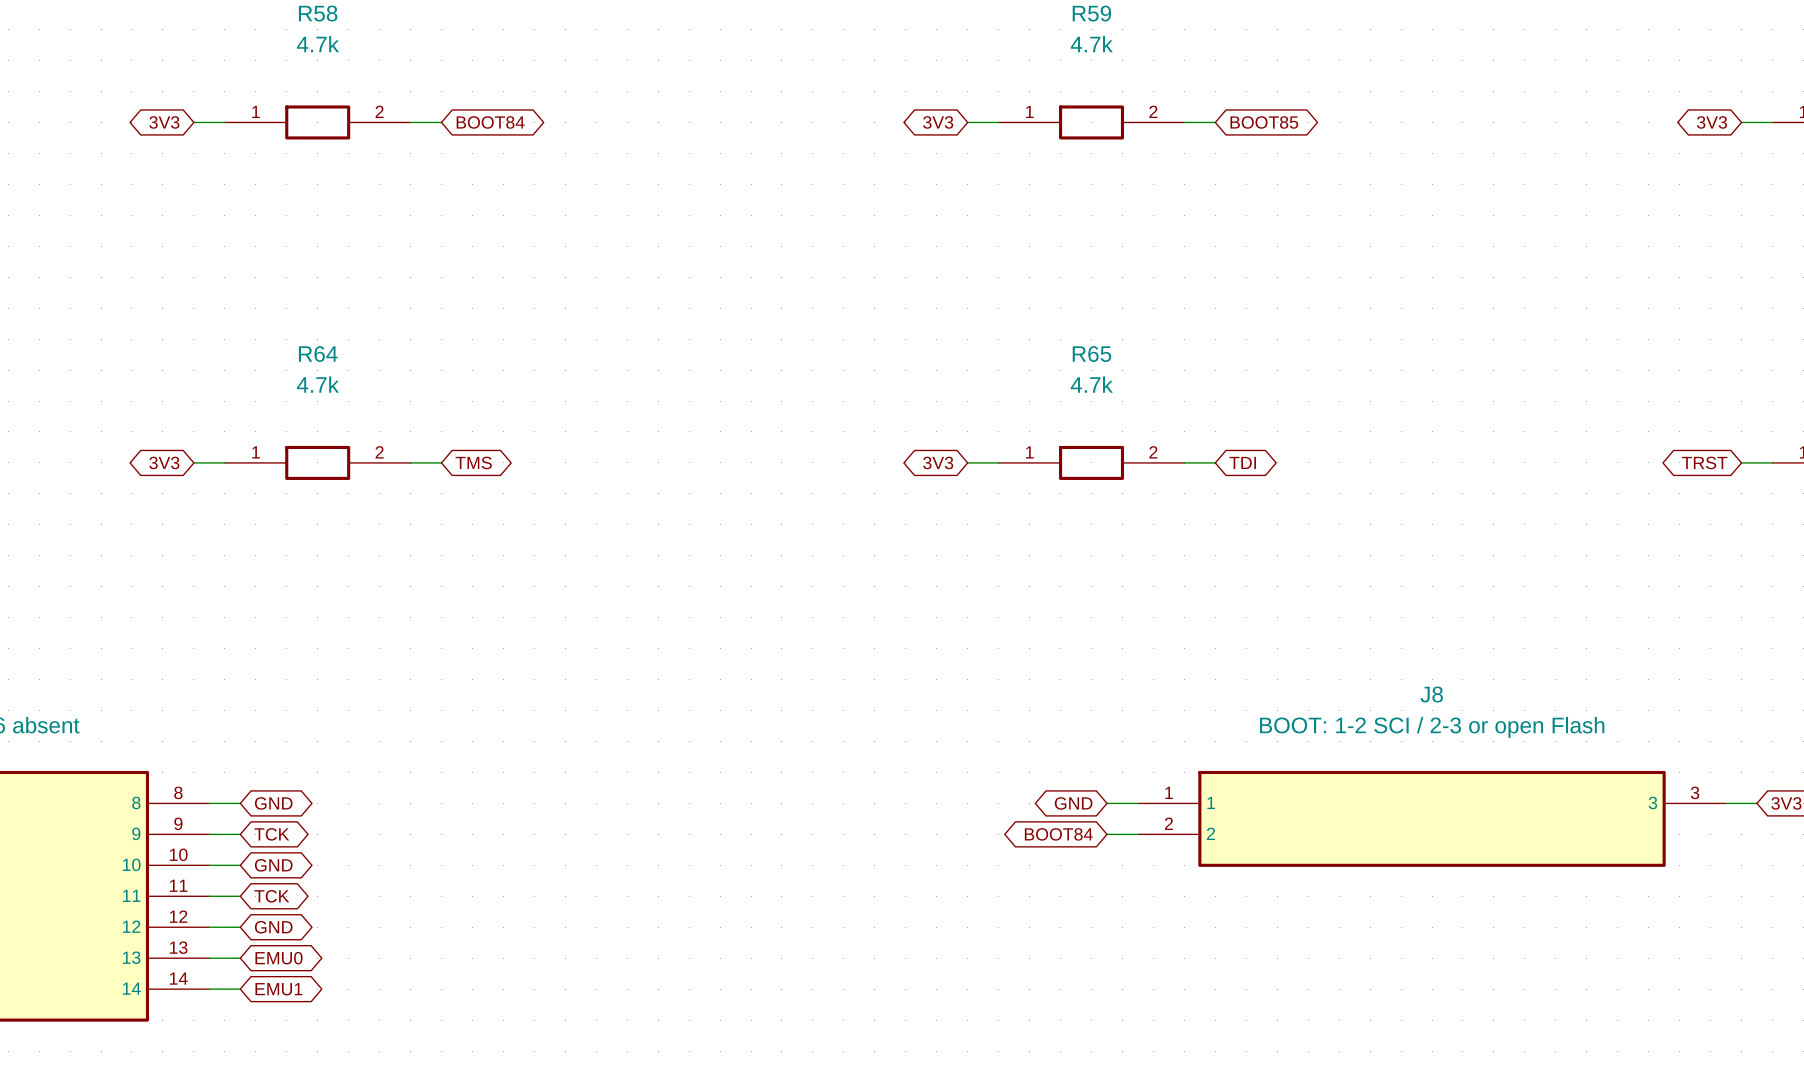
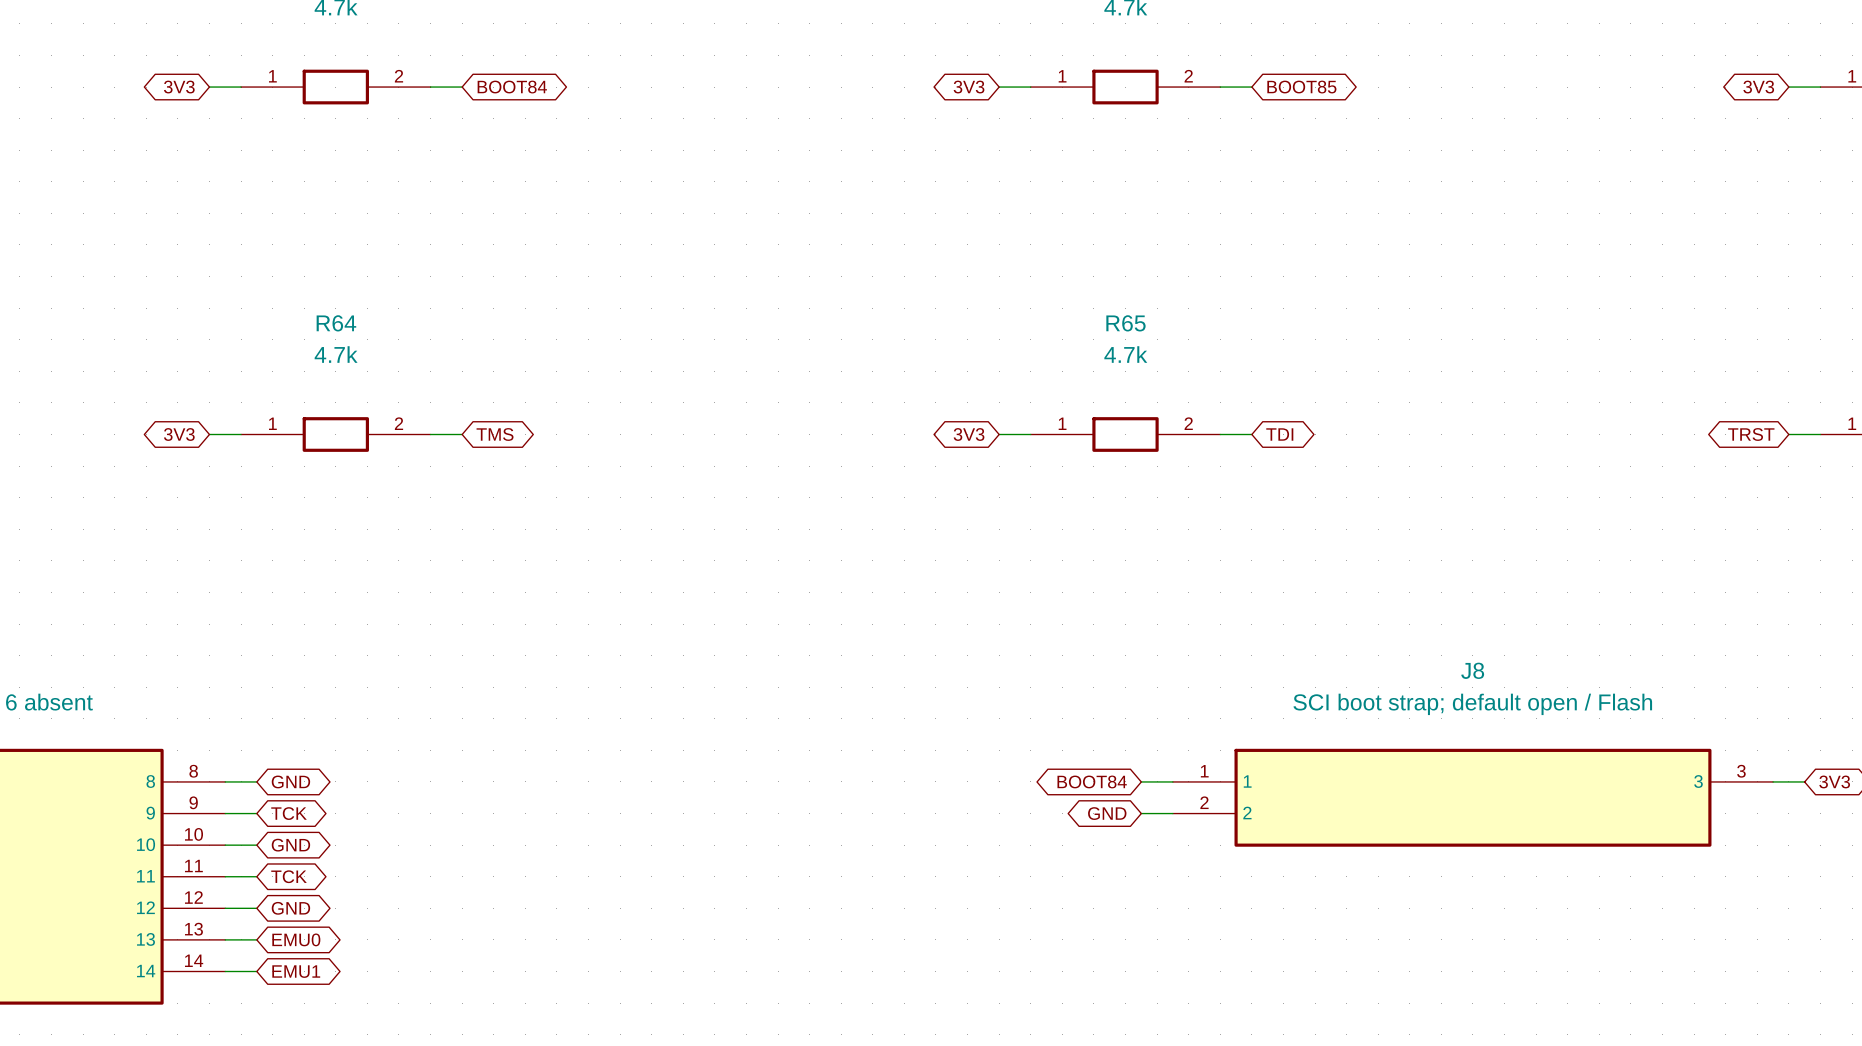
J8 value: BOOT: 1-2 SCI / 2-3 or open Flash (1432, 727) -> SCI boot strap; default open / Flash (1472, 704)
global label: GND (1073, 803) -> BOOT84 (1092, 781)
global label: BOOT84 (1058, 834) -> GND (1107, 813)

